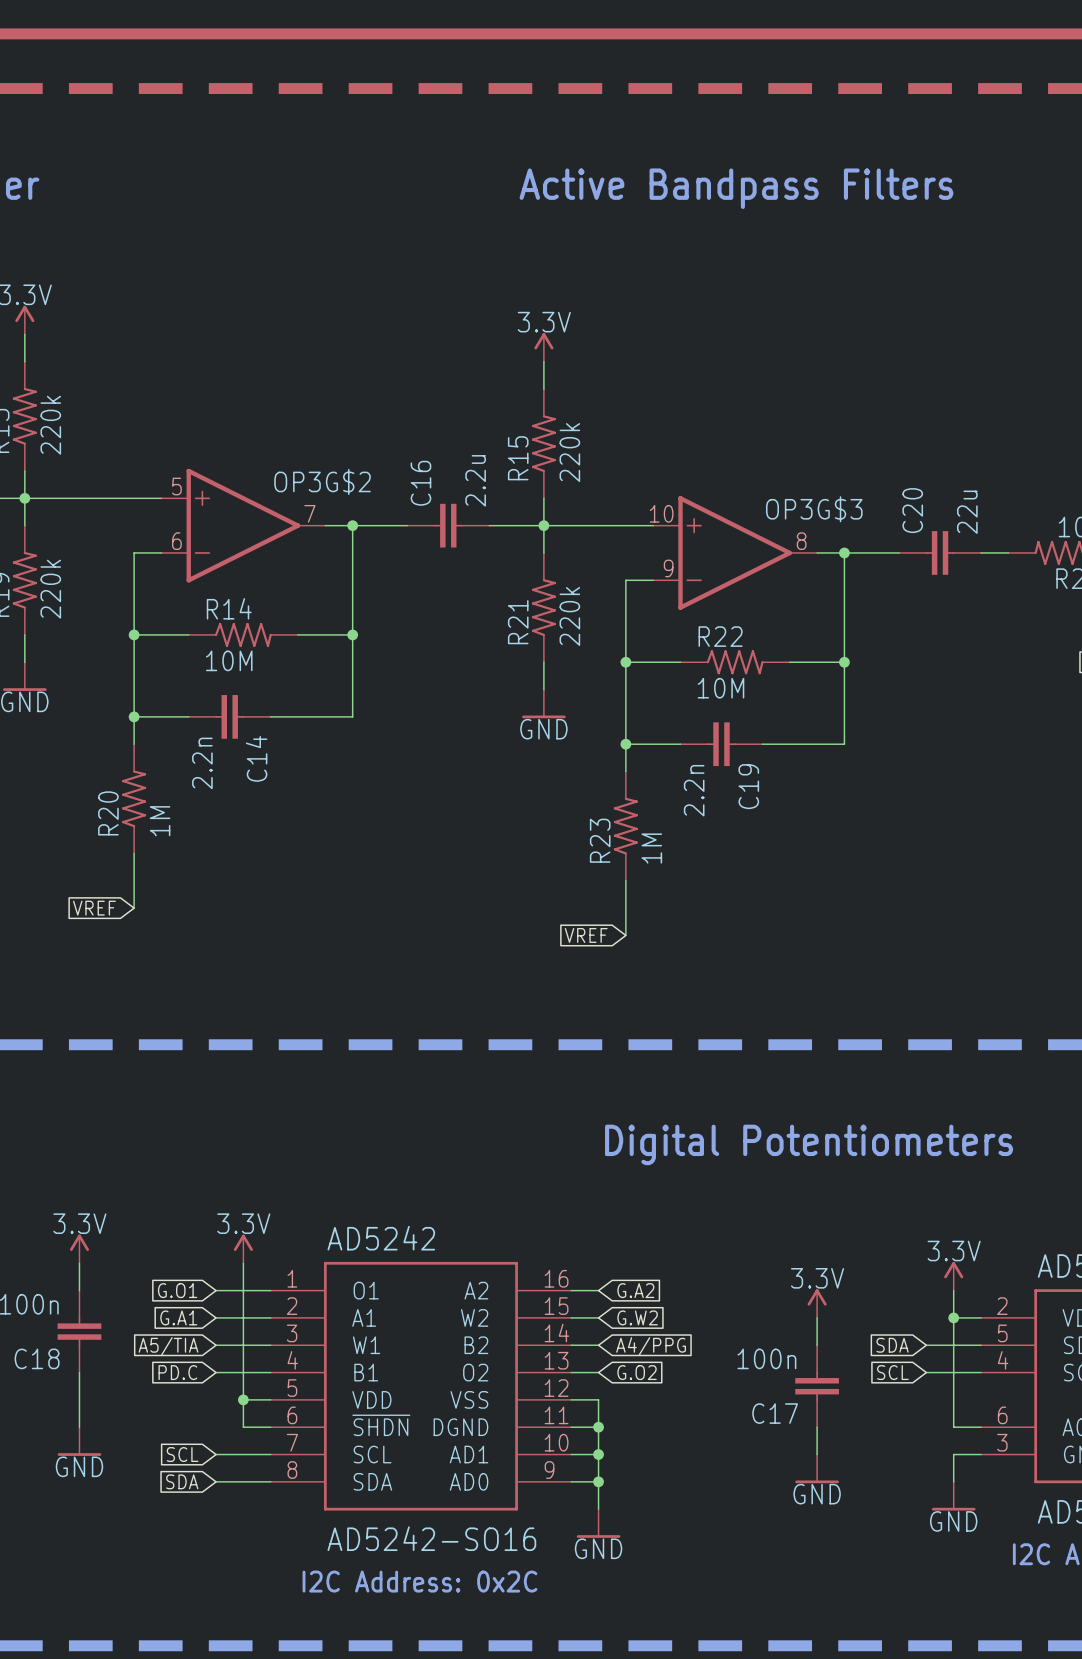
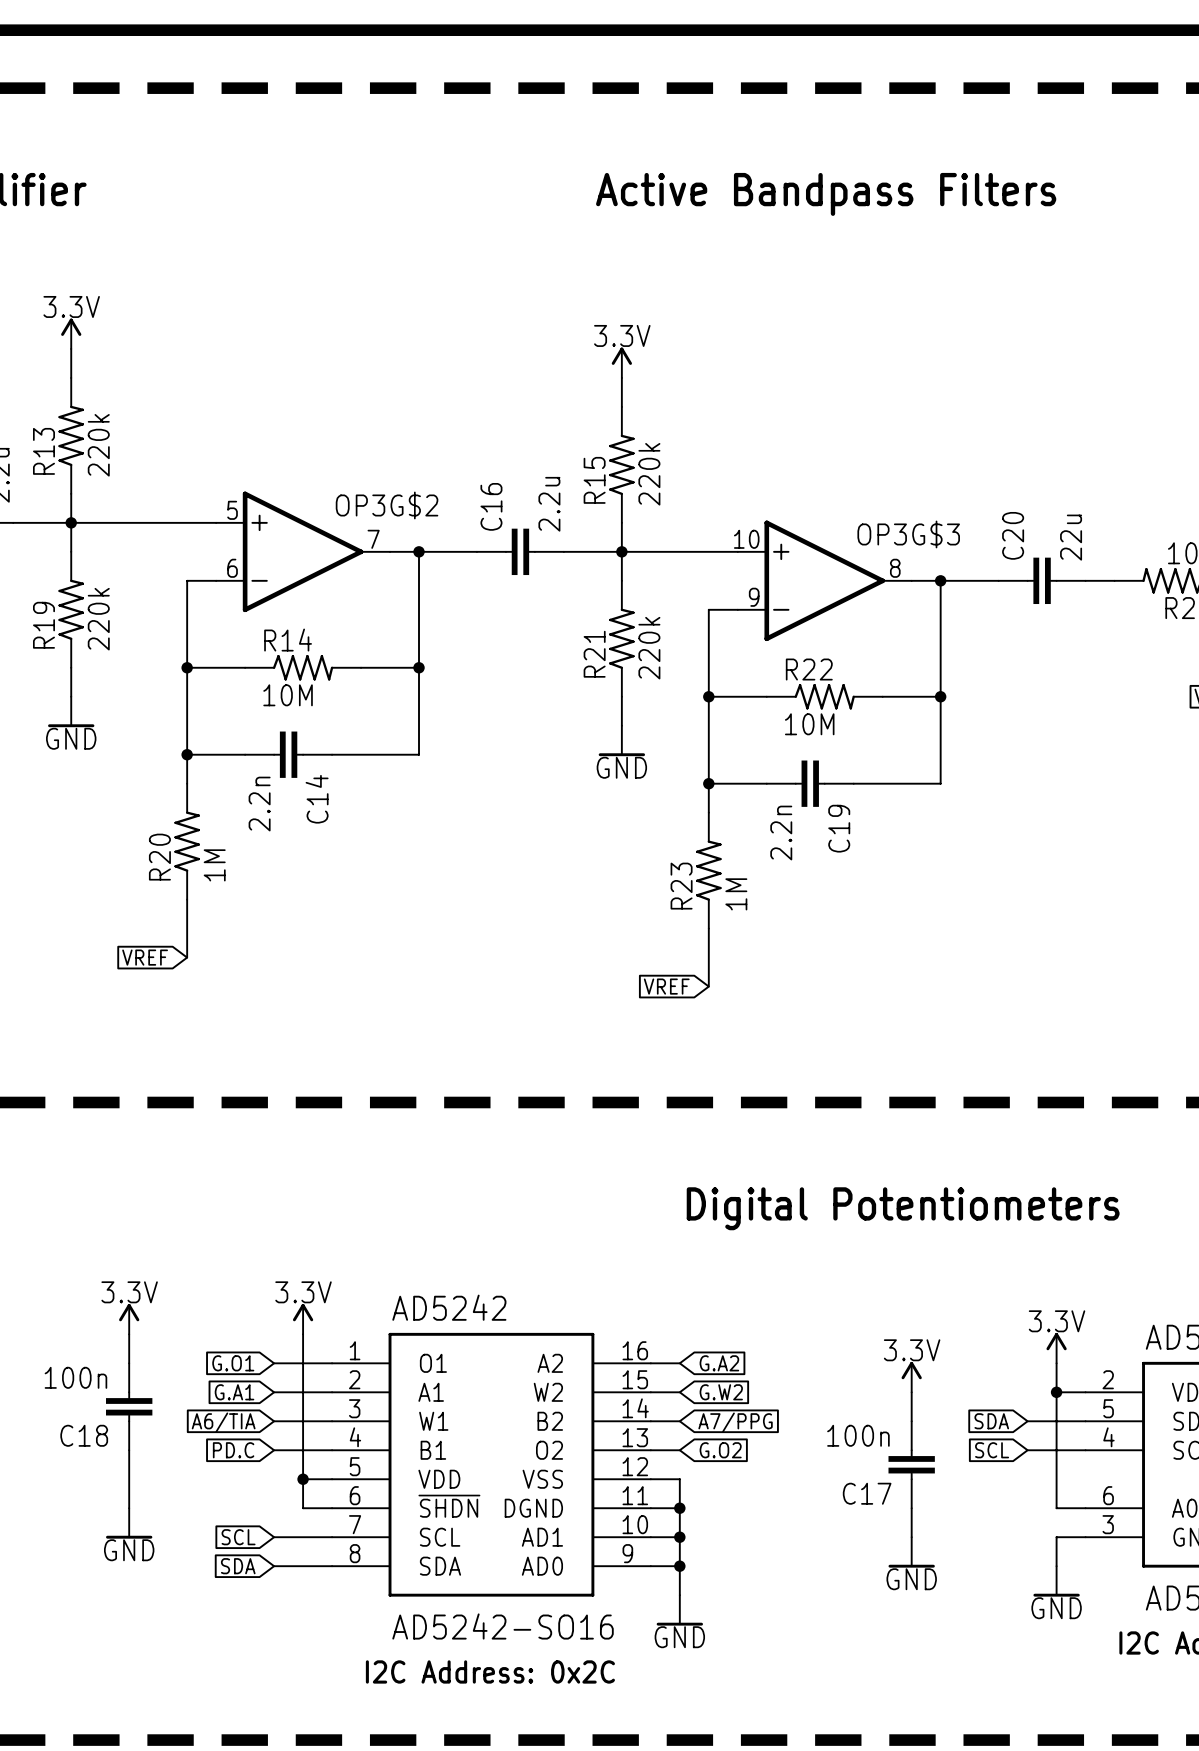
global label: A5/TIA (168, 1346) -> A6/TIA (223, 1422)
global label: A4/PPG (651, 1346) -> A7/PPG (735, 1422)

